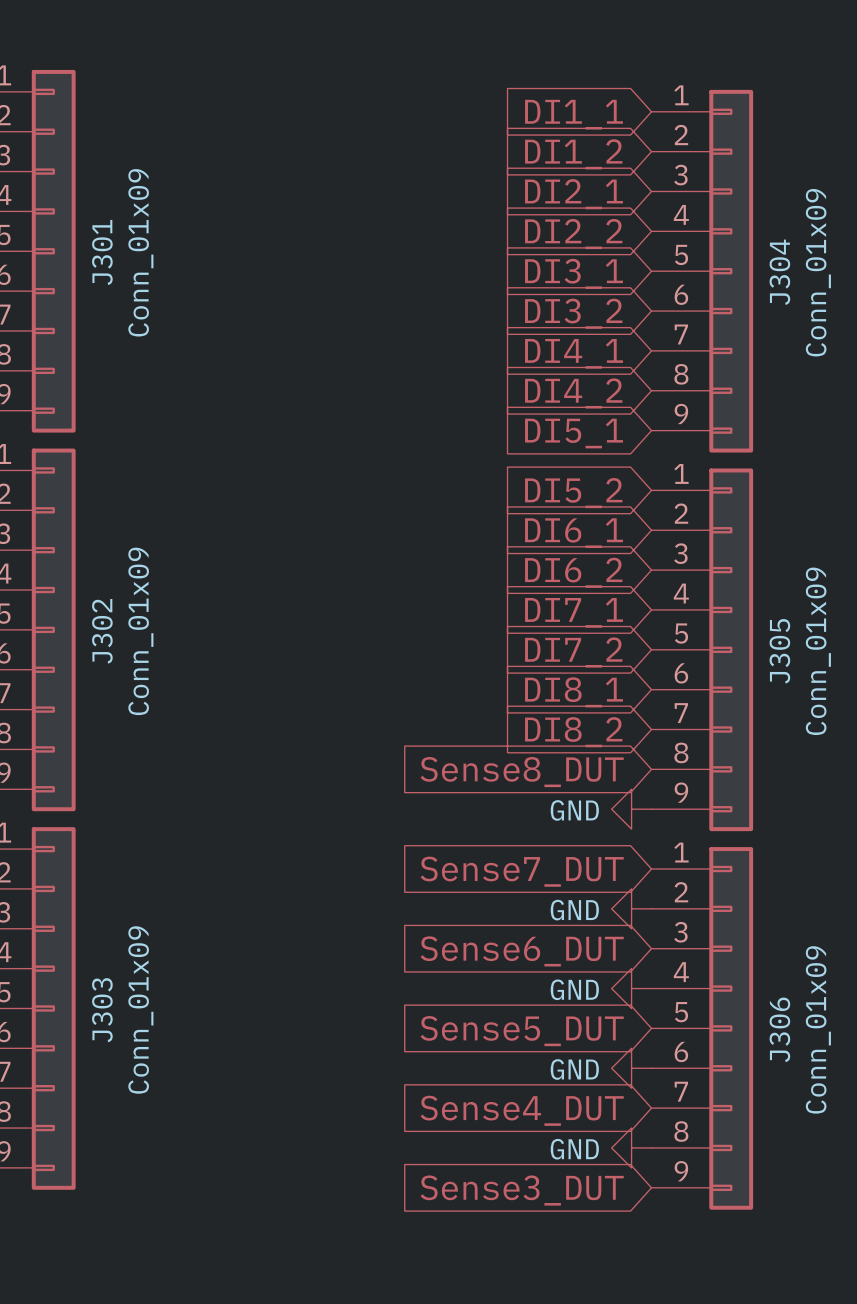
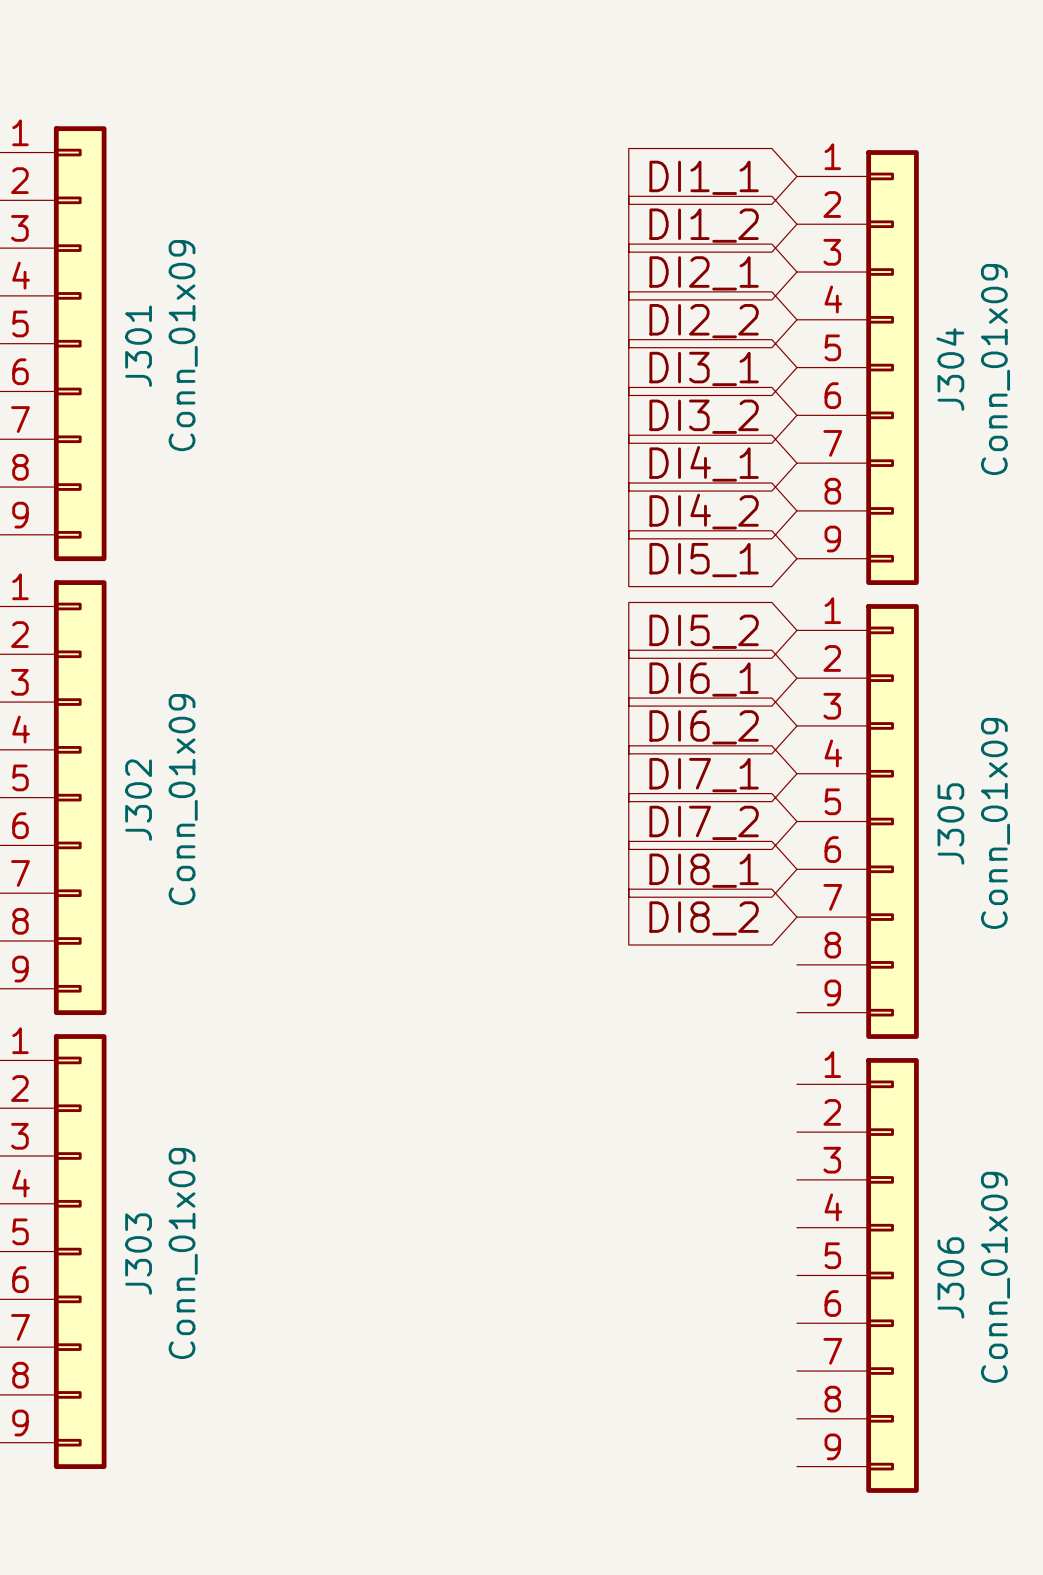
global label: Sense8_DUT (522, 772) -> none
power symbol: GND (631, 809) -> none
global label: Sense7_DUT (522, 871) -> none
power symbol: GND (631, 908) -> none
global label: Sense6_DUT (522, 951) -> none
power symbol: GND (631, 988) -> none
global label: Sense5_DUT (522, 1031) -> none
power symbol: GND (631, 1068) -> none
global label: Sense4_DUT (522, 1110) -> none
power symbol: GND (631, 1147) -> none
global label: Sense3_DUT (522, 1190) -> none

